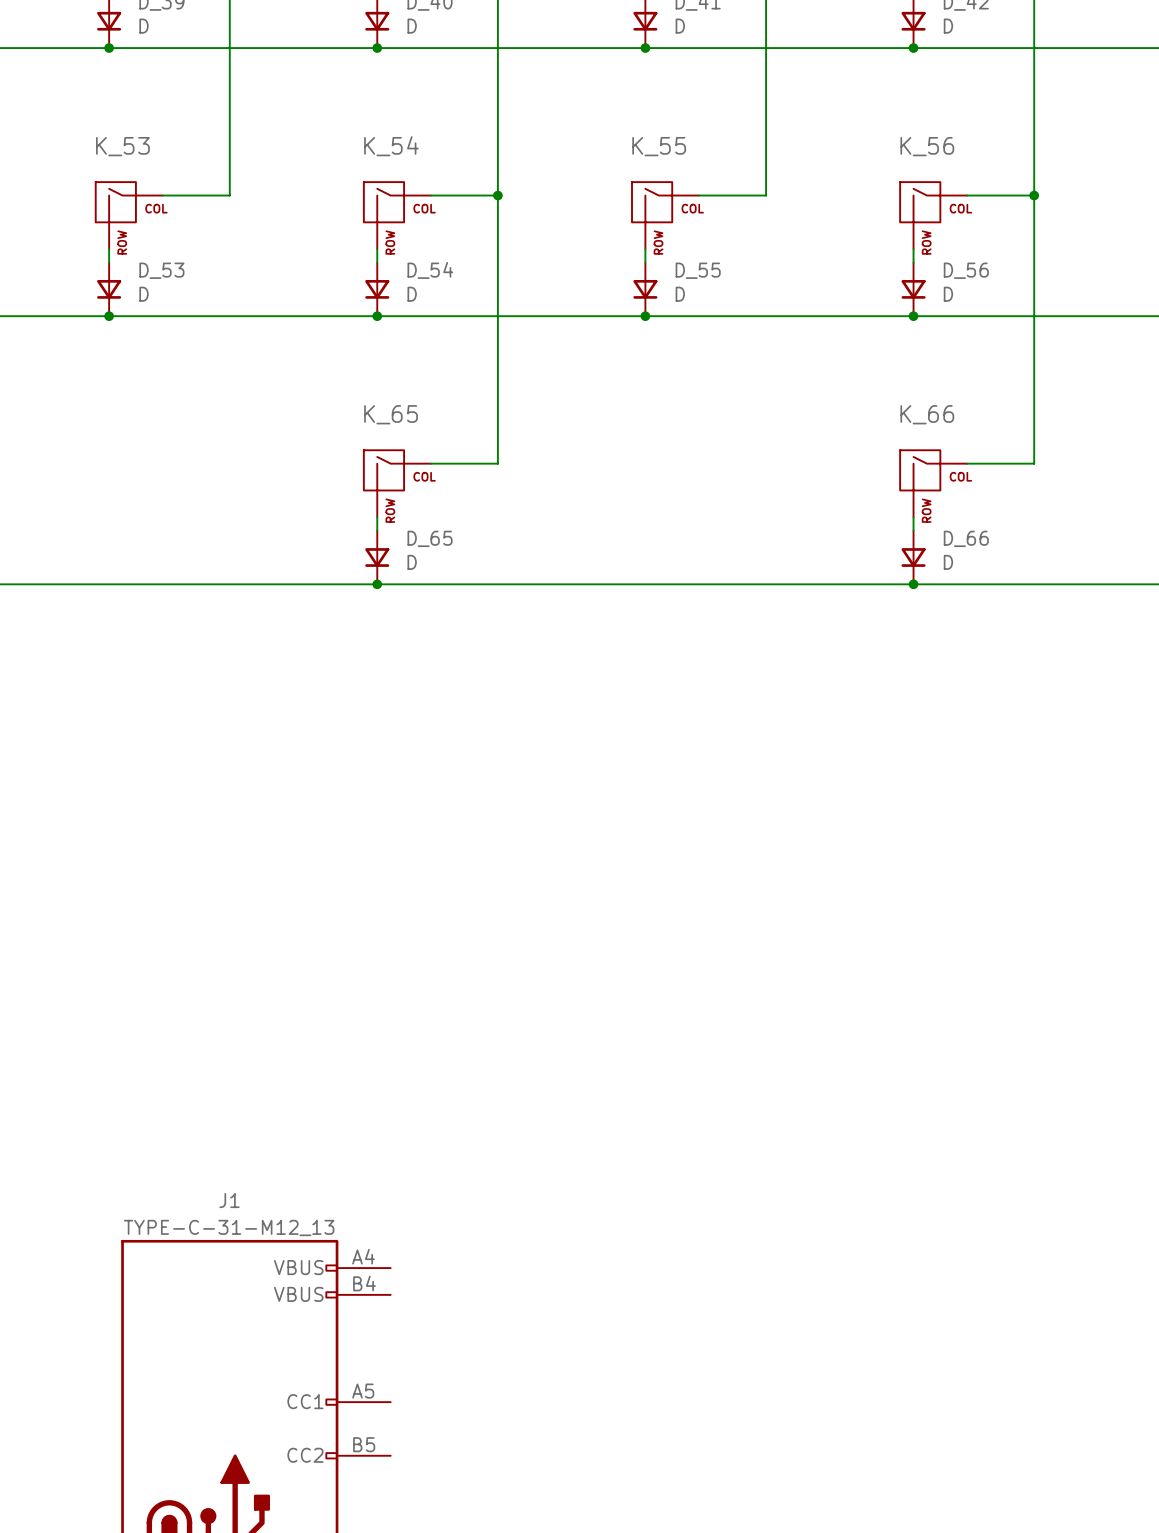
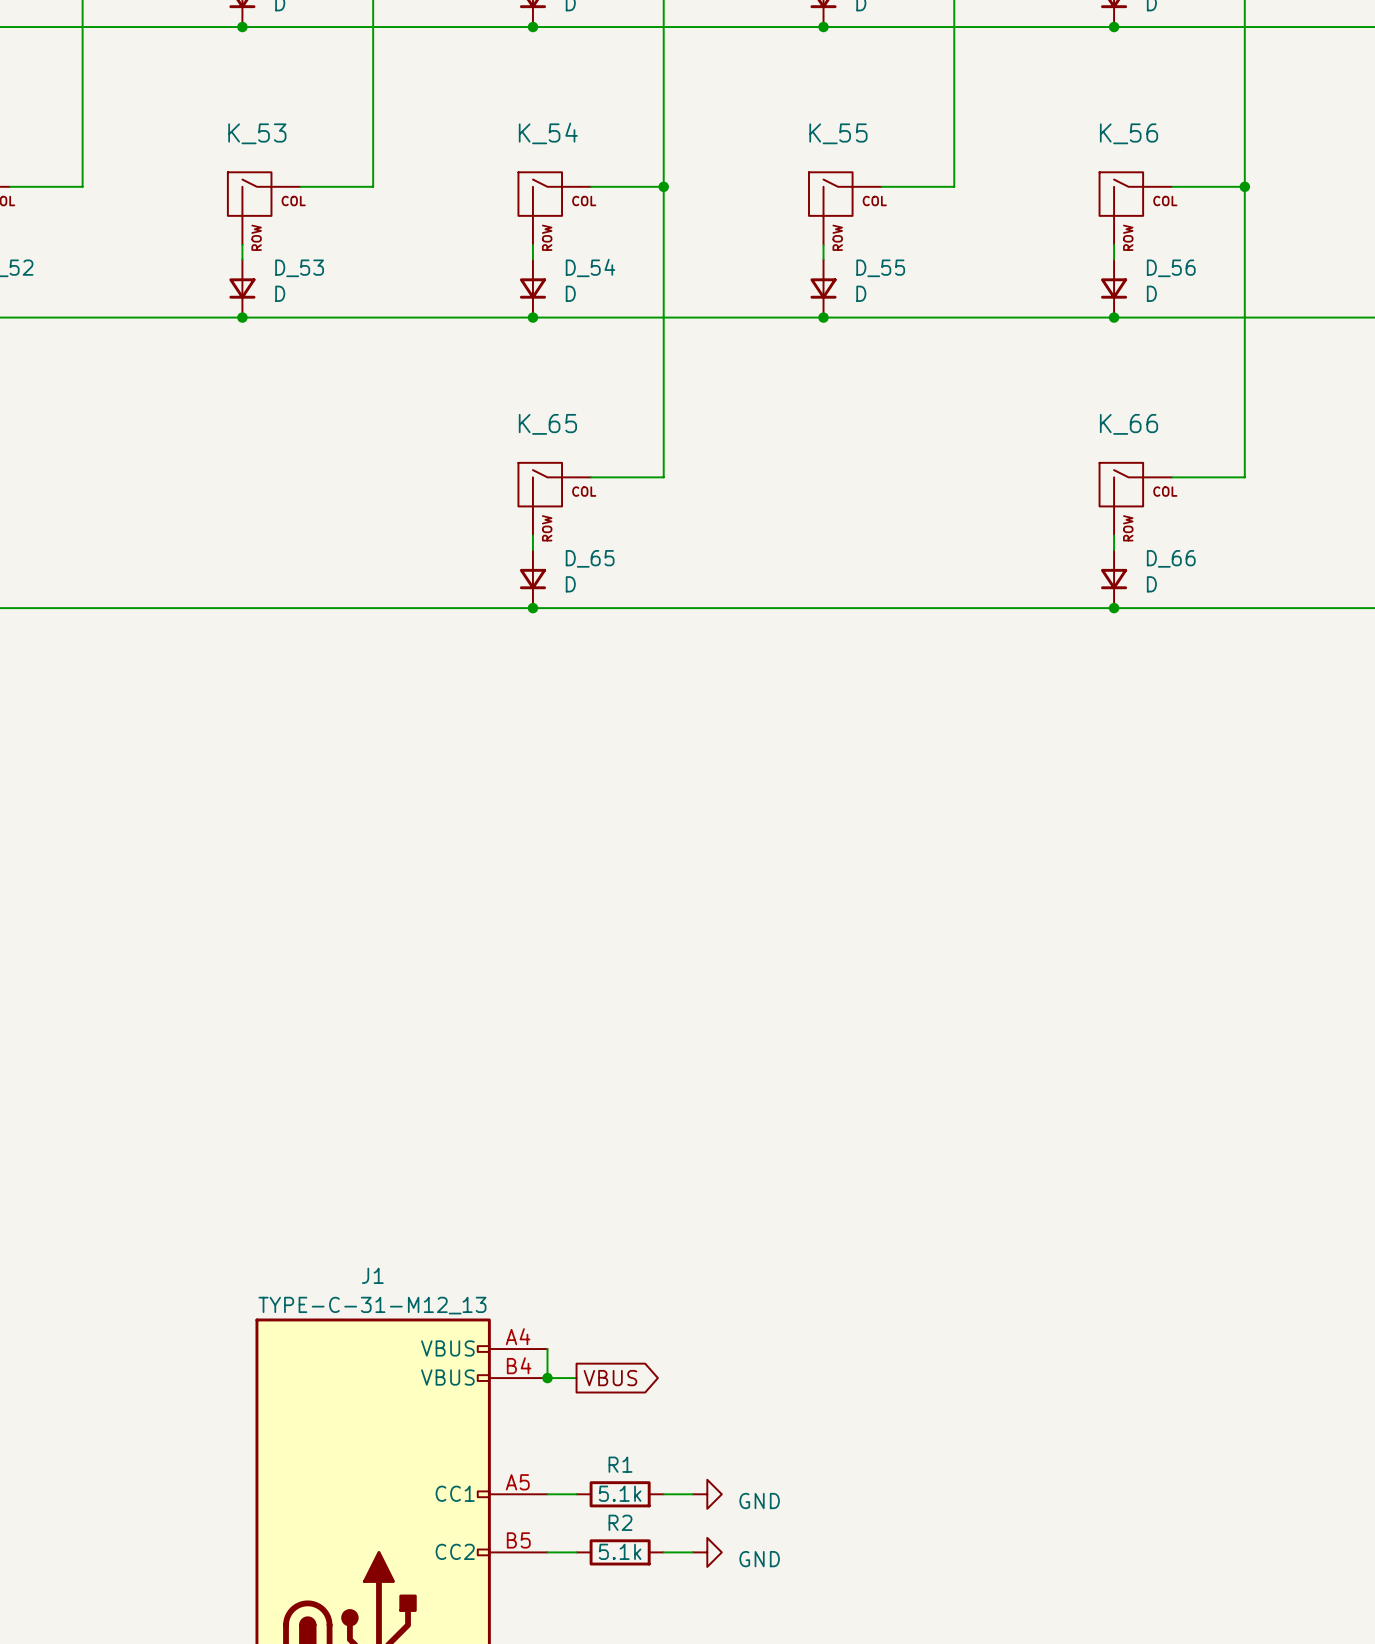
wire: none -> (547, 1349) (547, 1378) (576, 1378)
junction: none -> (547, 1378)
global label: none -> VBUS (610, 1378)
wire: none -> (547, 1494) (576, 1494)
R1: none -> 5.1k (620, 1494)
wire: none -> (663, 1494) (692, 1494)
power symbol: none -> GND (707, 1494)
wire: none -> (547, 1552) (576, 1552)
R2: none -> 5.1k (620, 1552)
wire: none -> (663, 1552) (692, 1552)
power symbol: none -> GND (707, 1552)

